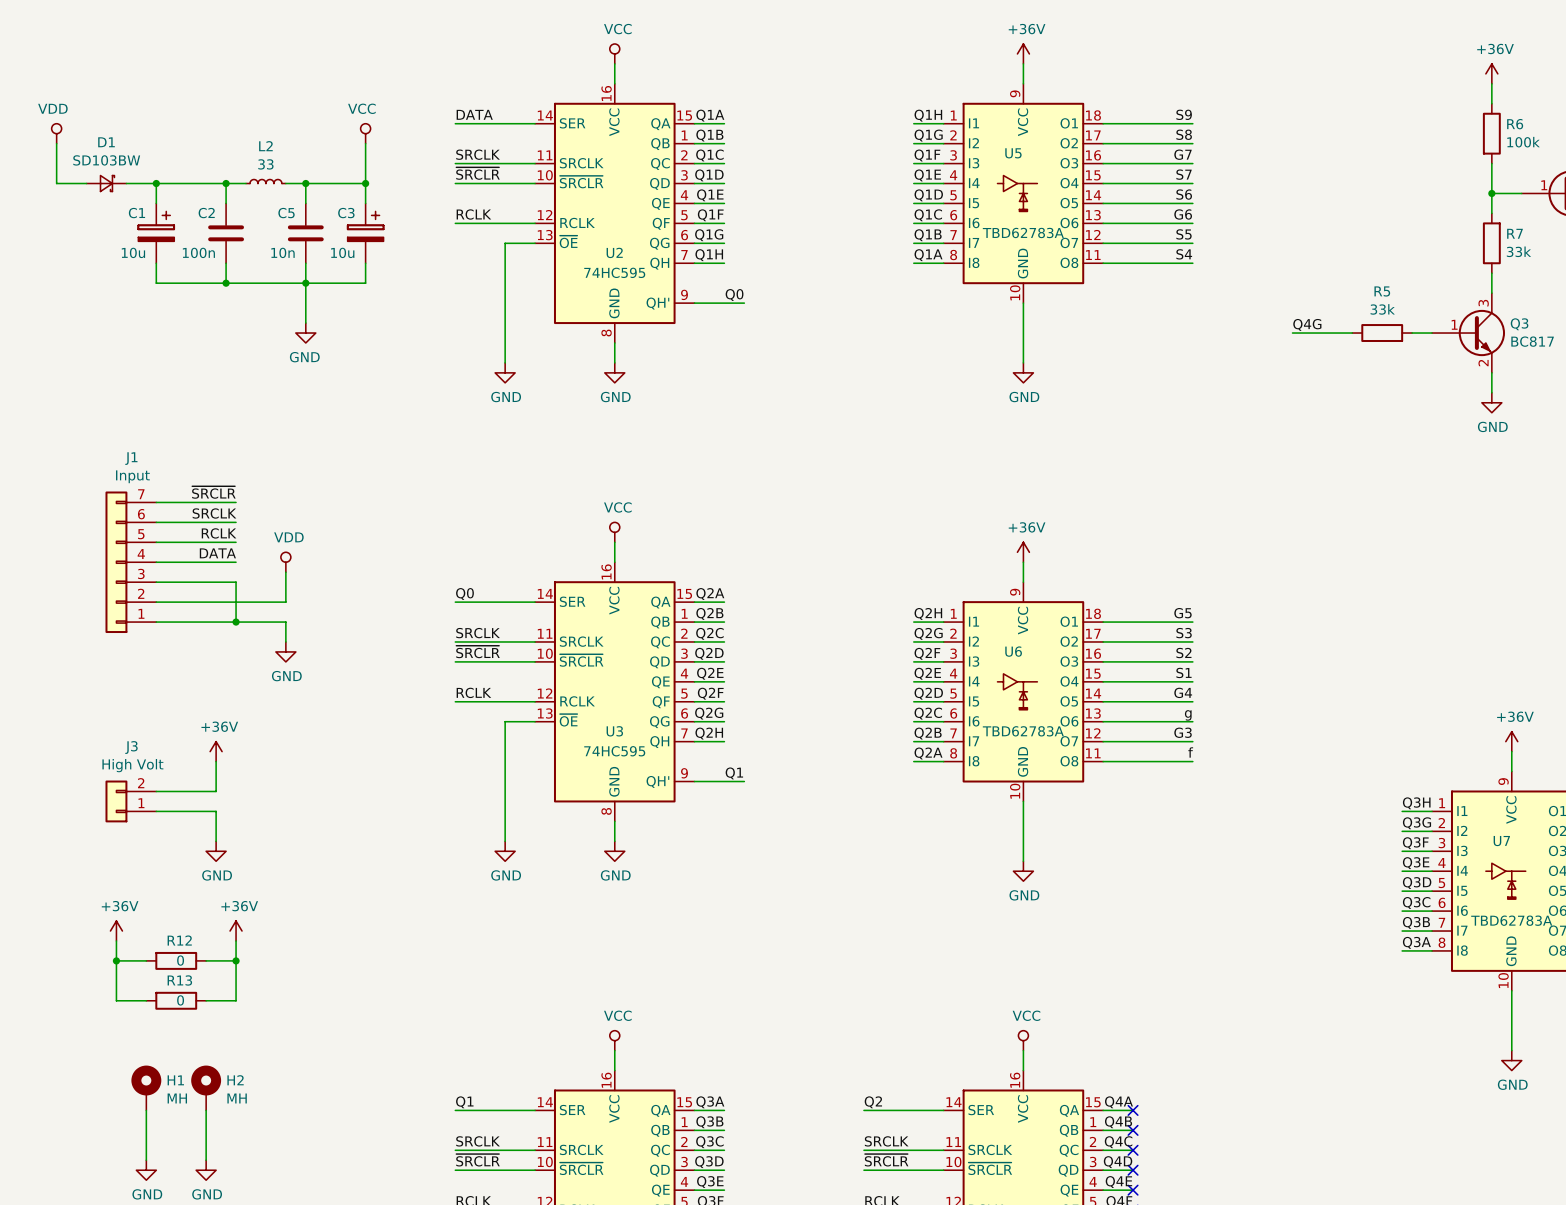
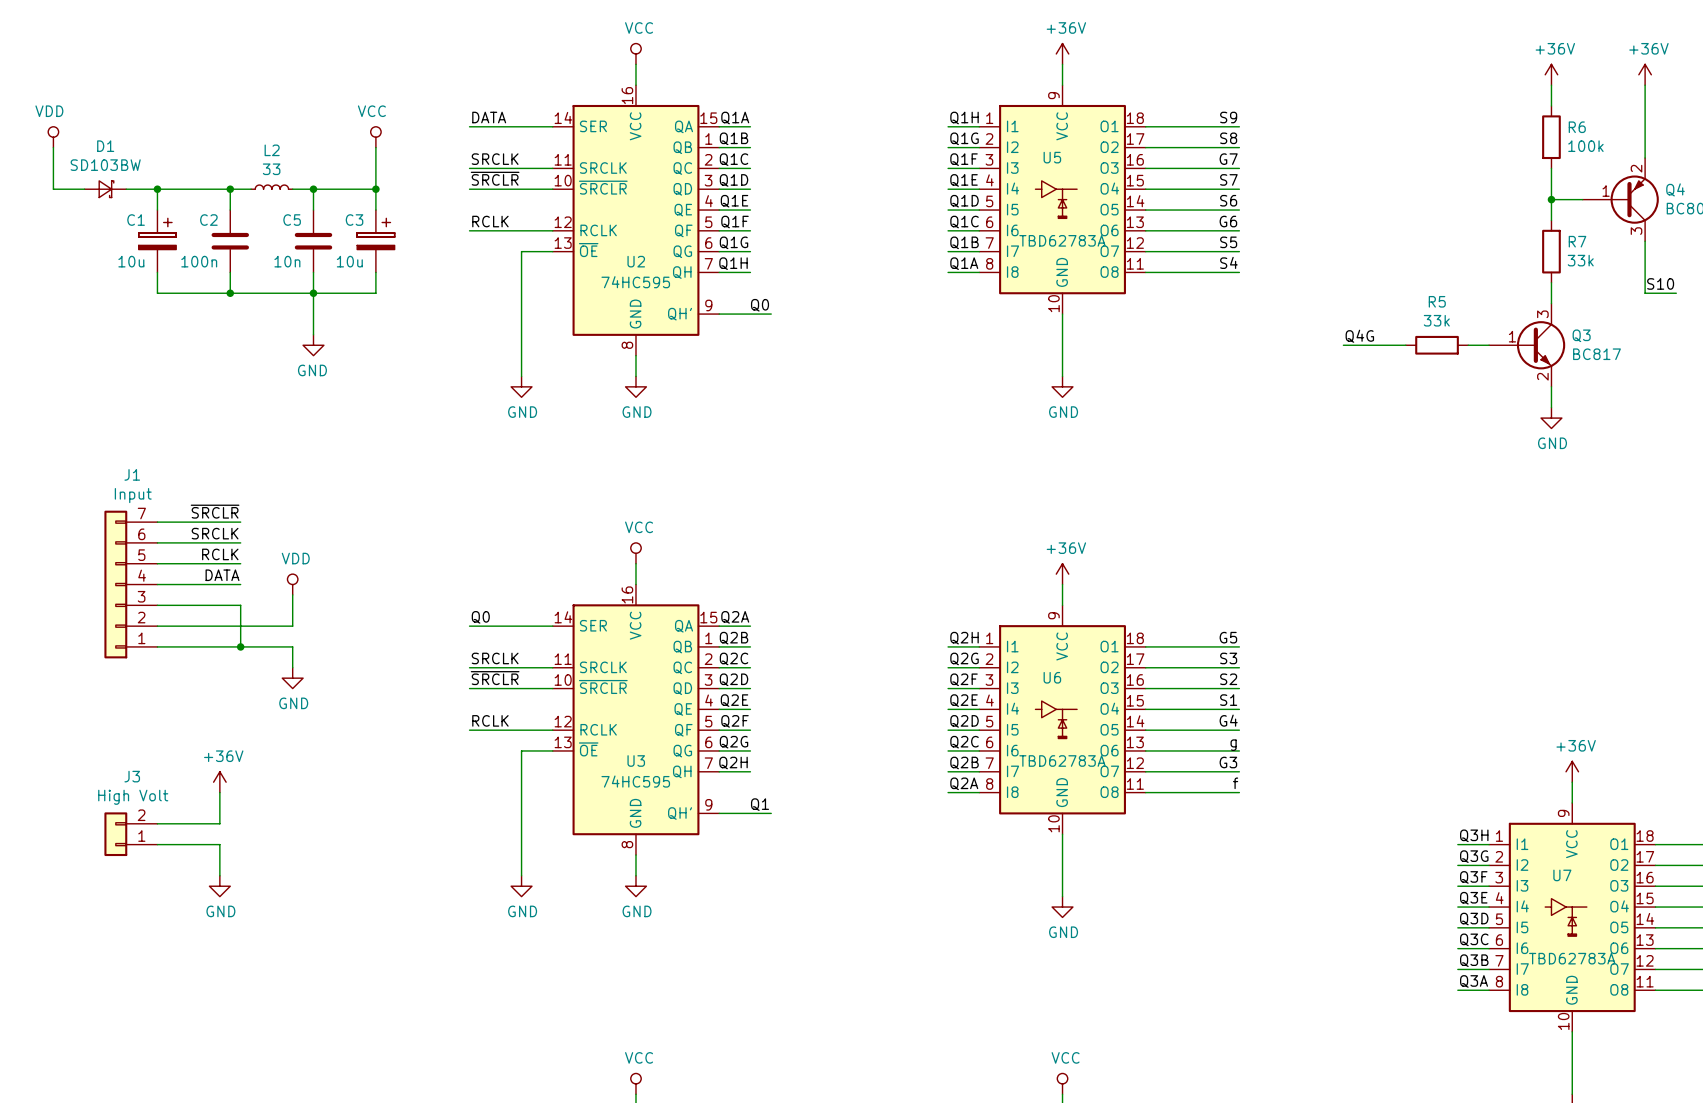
power symbol: +36V (116, 931) -> none
power symbol: +36V (236, 931) -> none
wire: (116, 940) (116, 1000) (146, 1000) -> none
wire: (236, 940) (236, 1000) (206, 1000) -> none
wire: (116, 960) (146, 960) -> none
junction: (116, 960) -> none
R12: 0 (176, 960) -> none
wire: (206, 960) (236, 960) -> none
junction: (236, 960) -> none
R13: 0 (176, 1000) -> none

